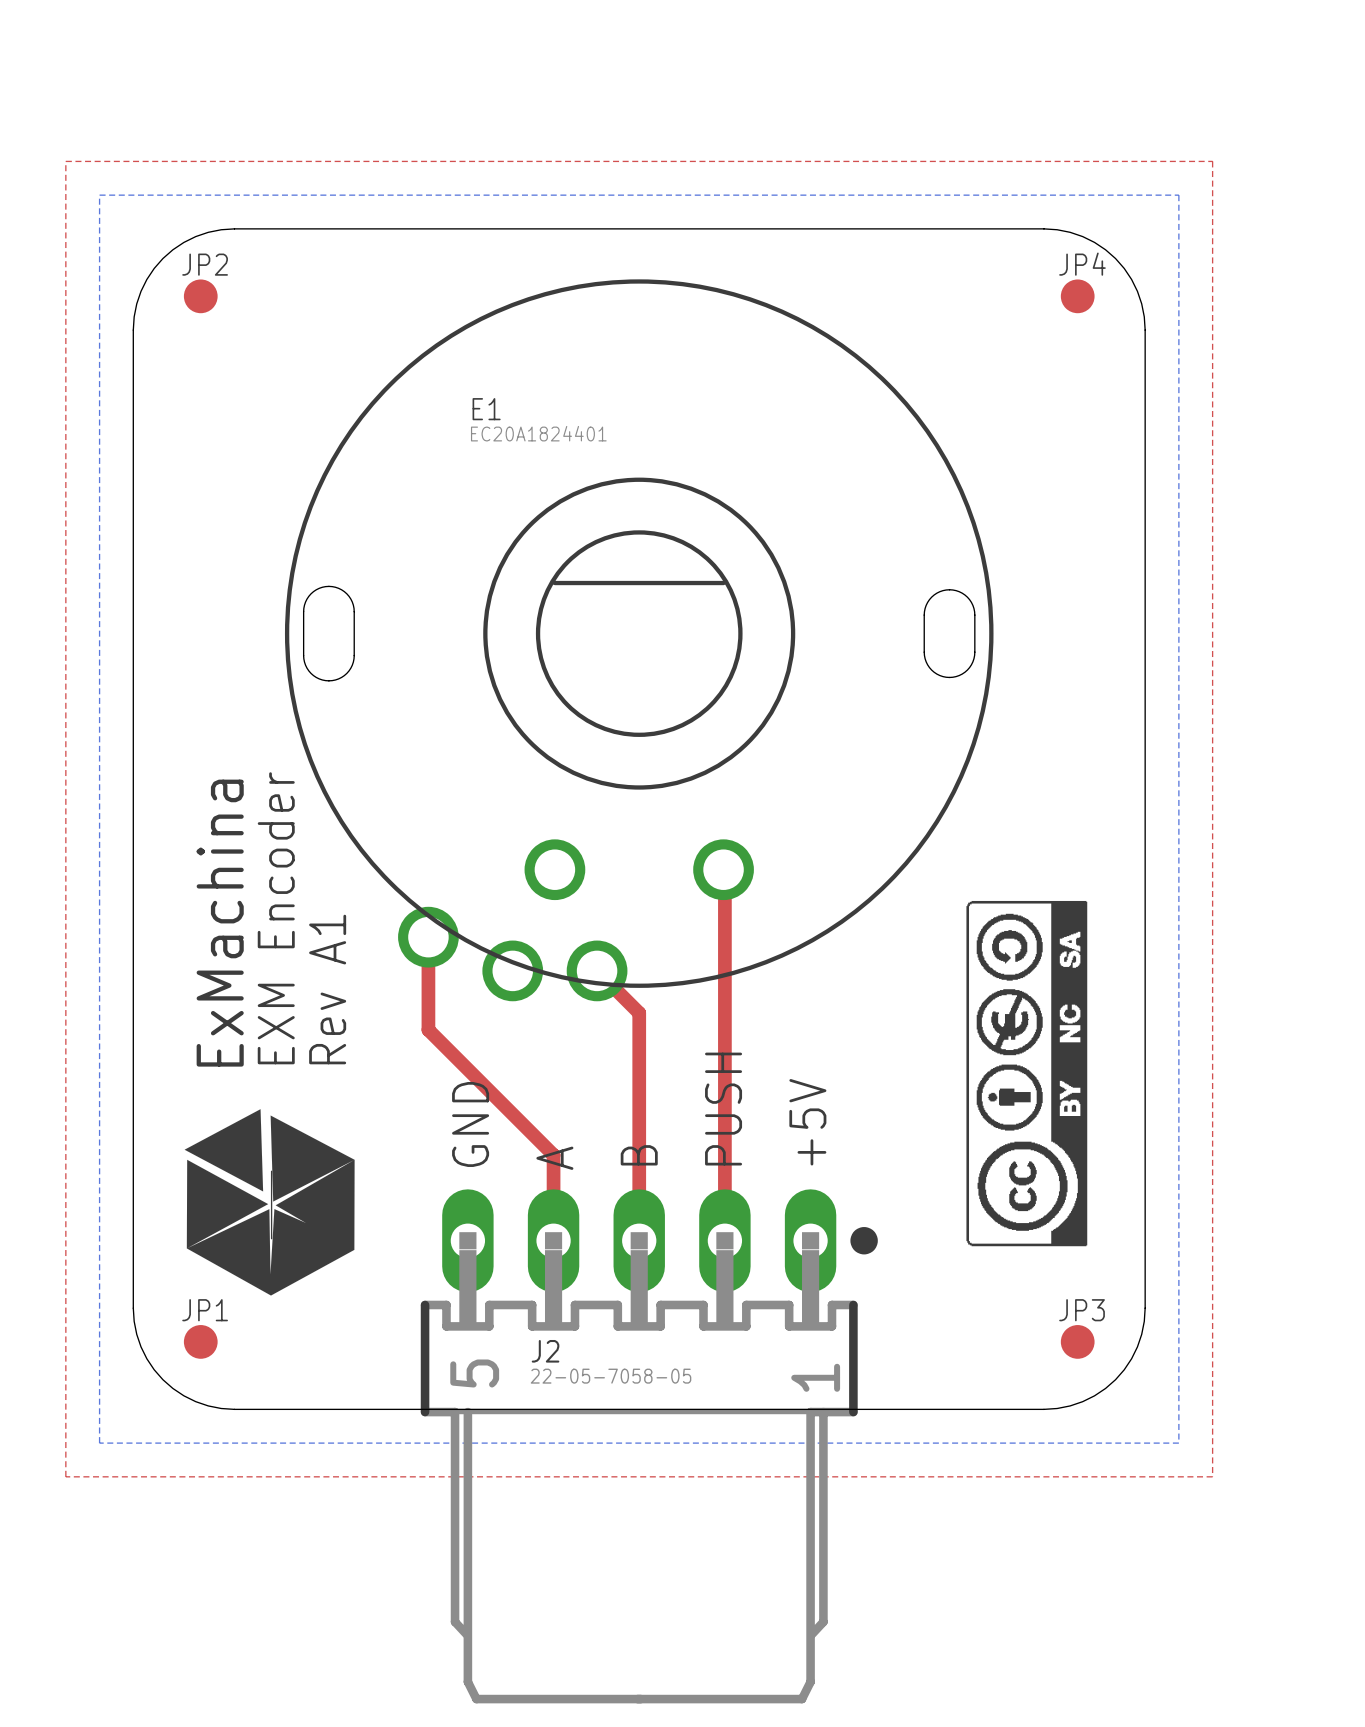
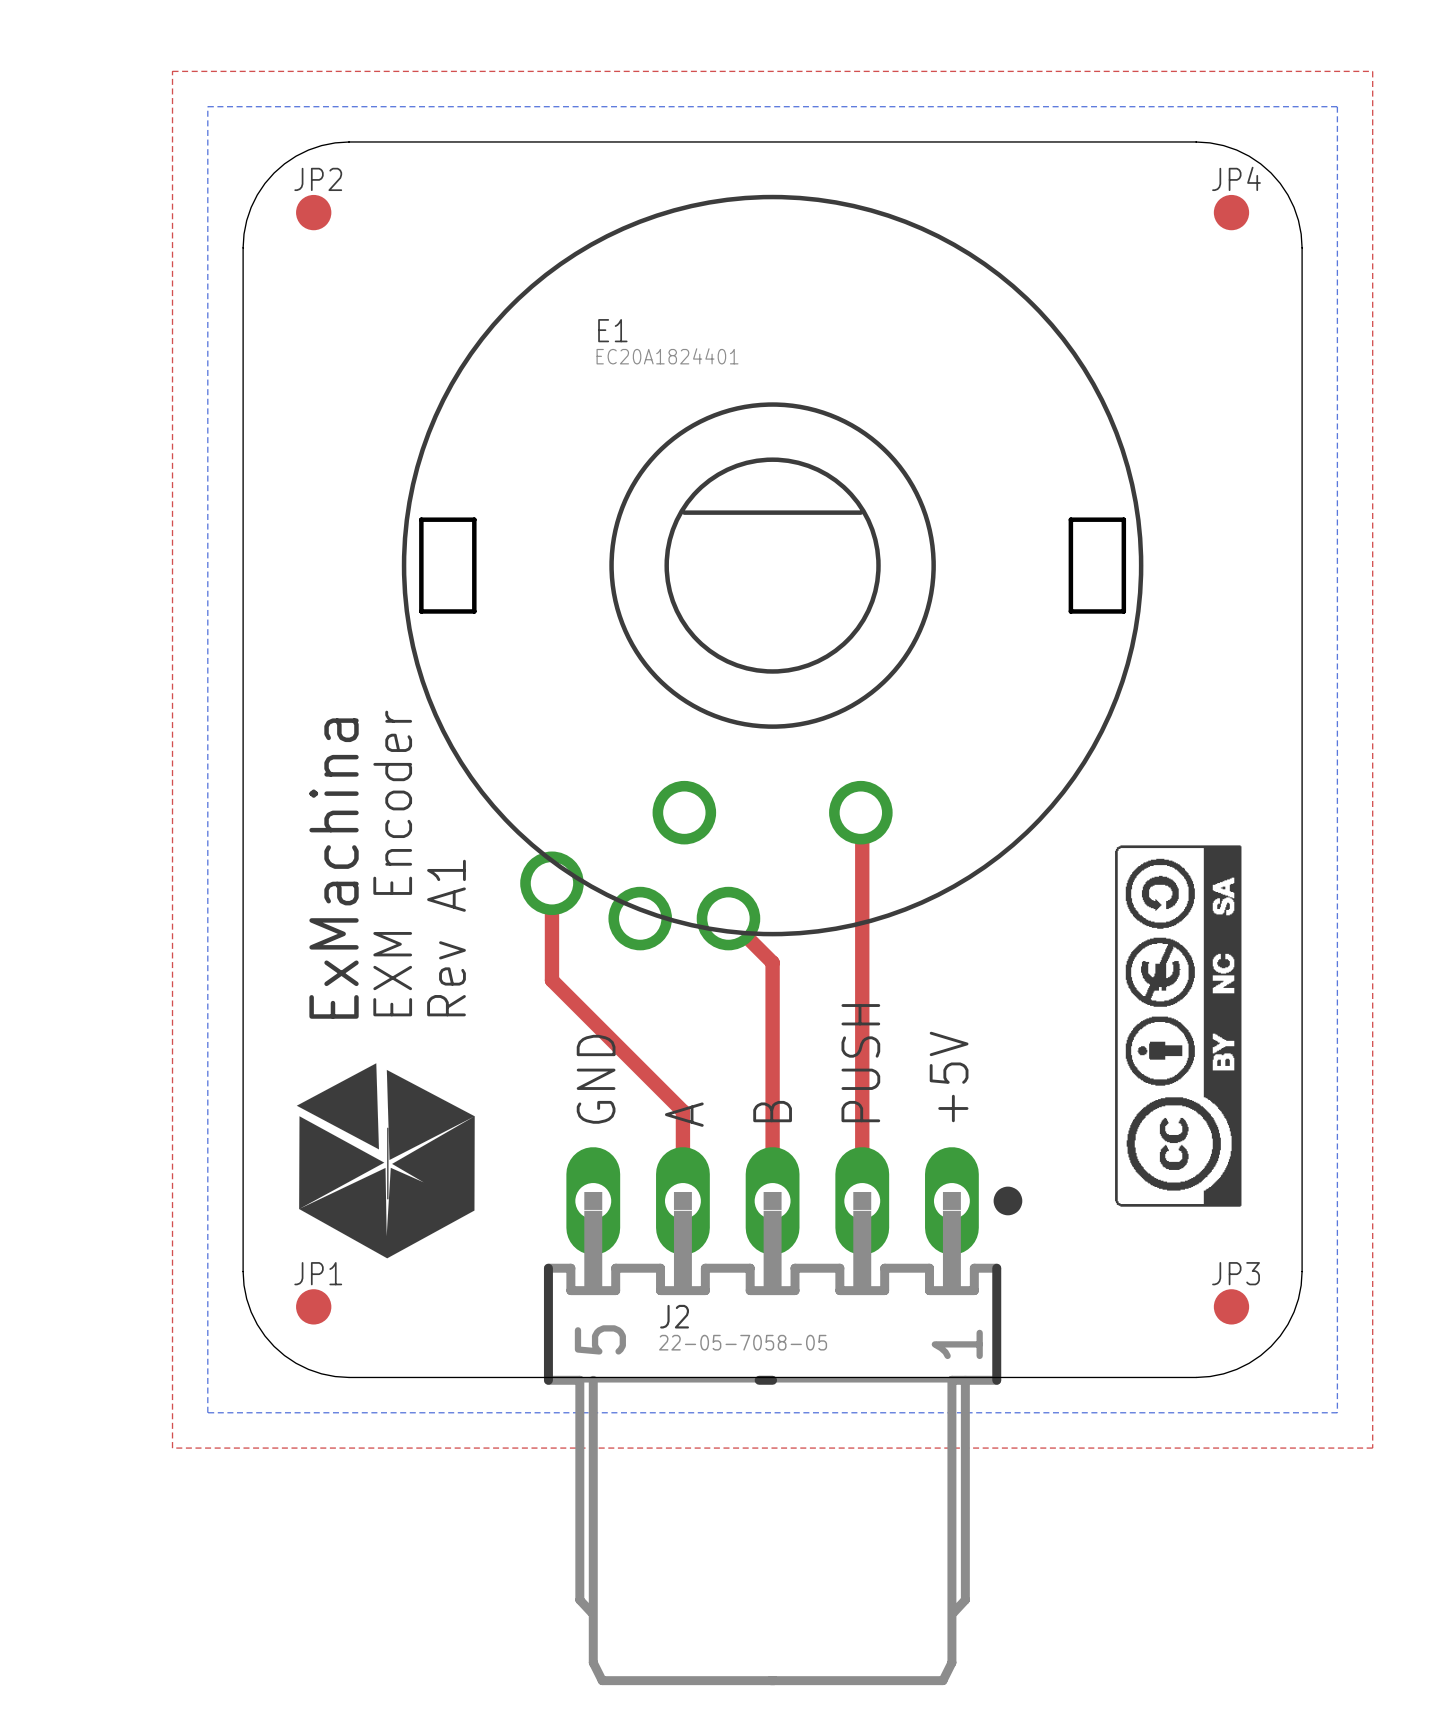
E1 footprint: [284, 279, 994, 1002] -> [401, 194, 1144, 951]
J2 footprint: [420, 1189, 878, 1704] -> [543, 1147, 1023, 1686]

